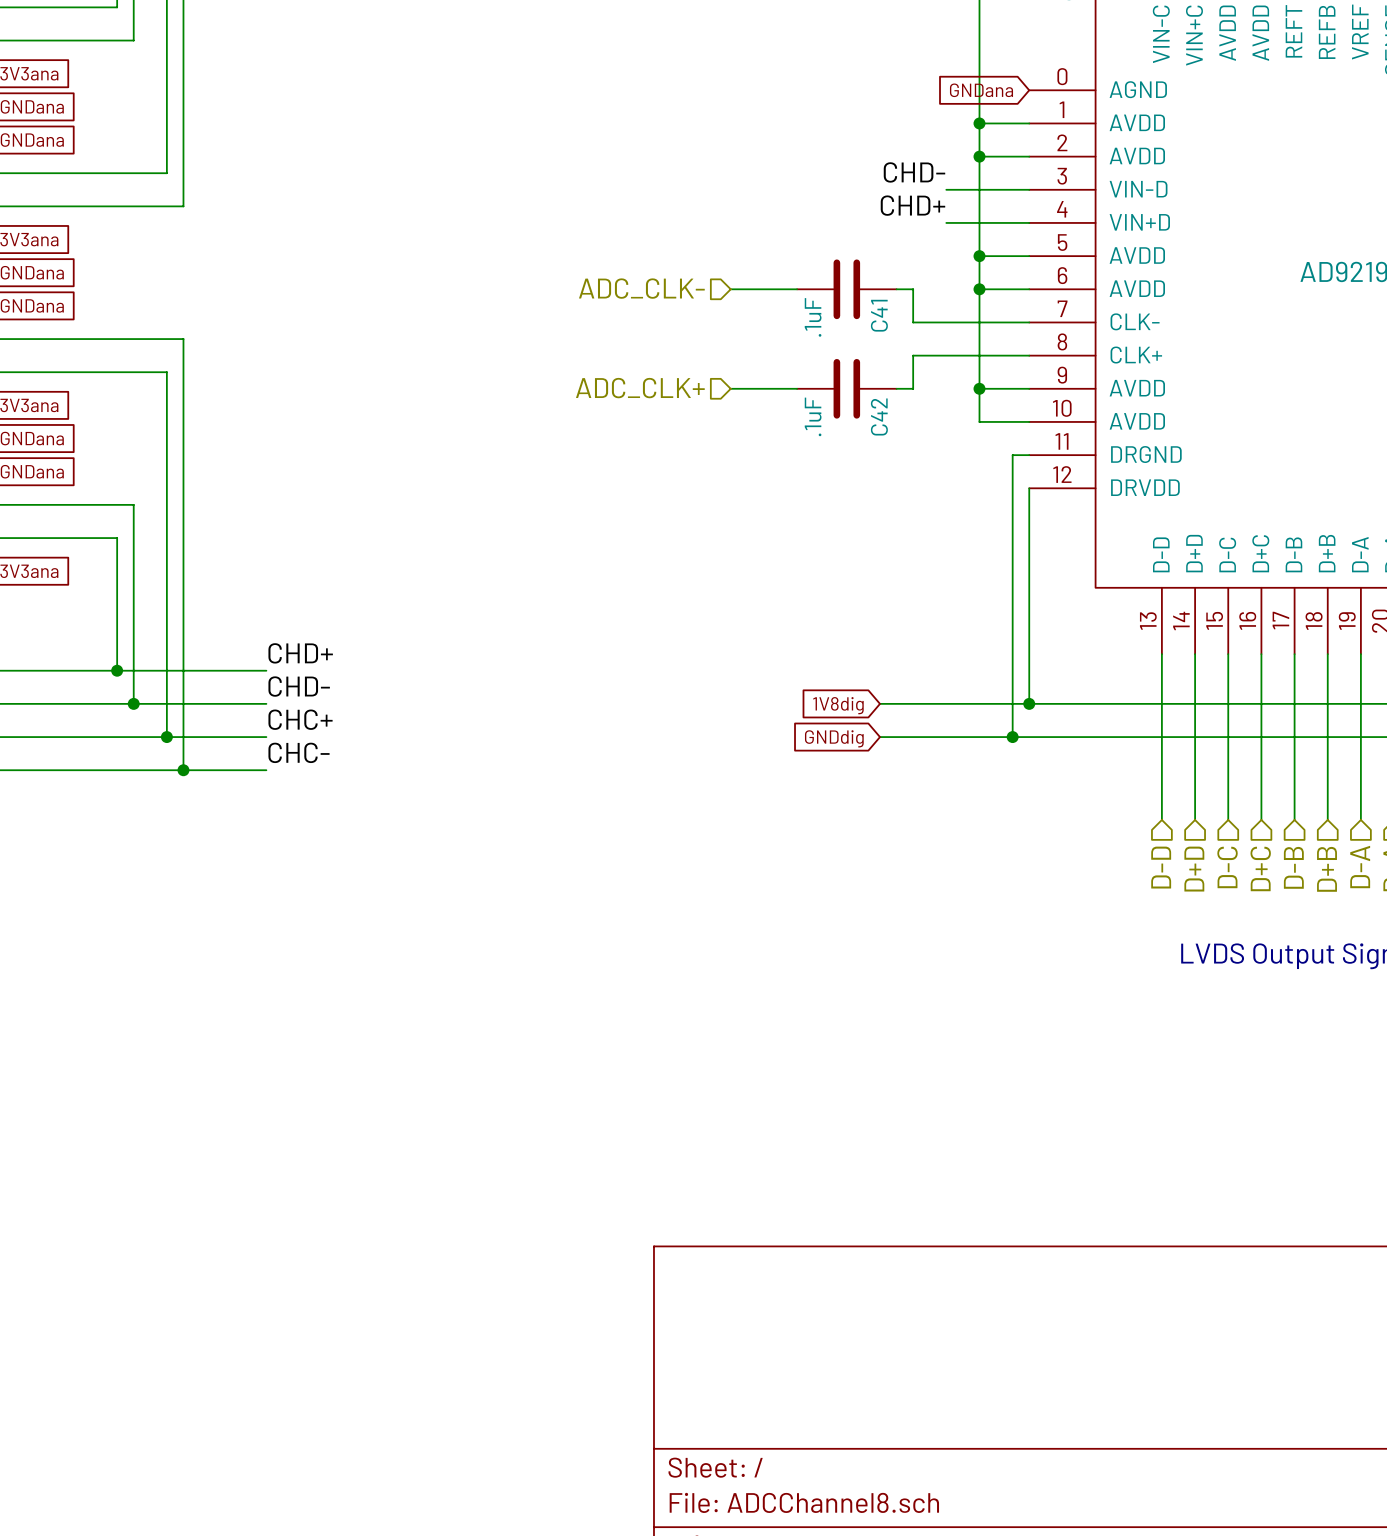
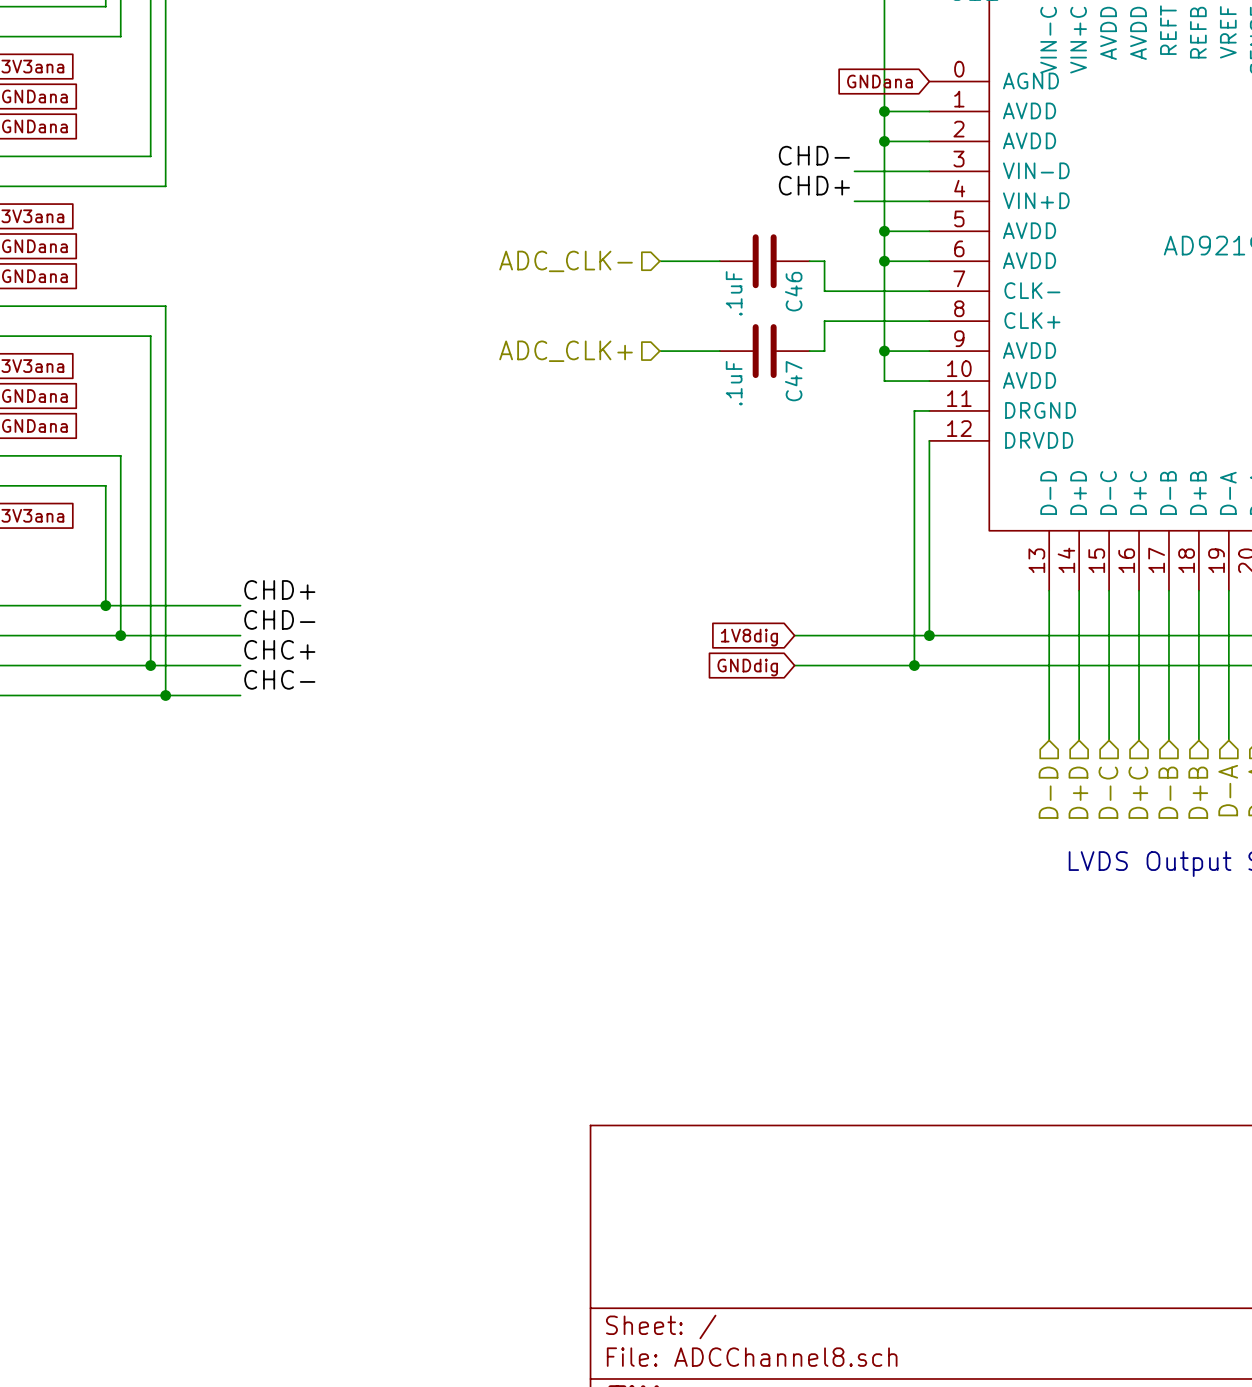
C41 name: C41 (879, 315) -> C46 (793, 291)
C42 name: C42 (879, 416) -> C47 (793, 381)

